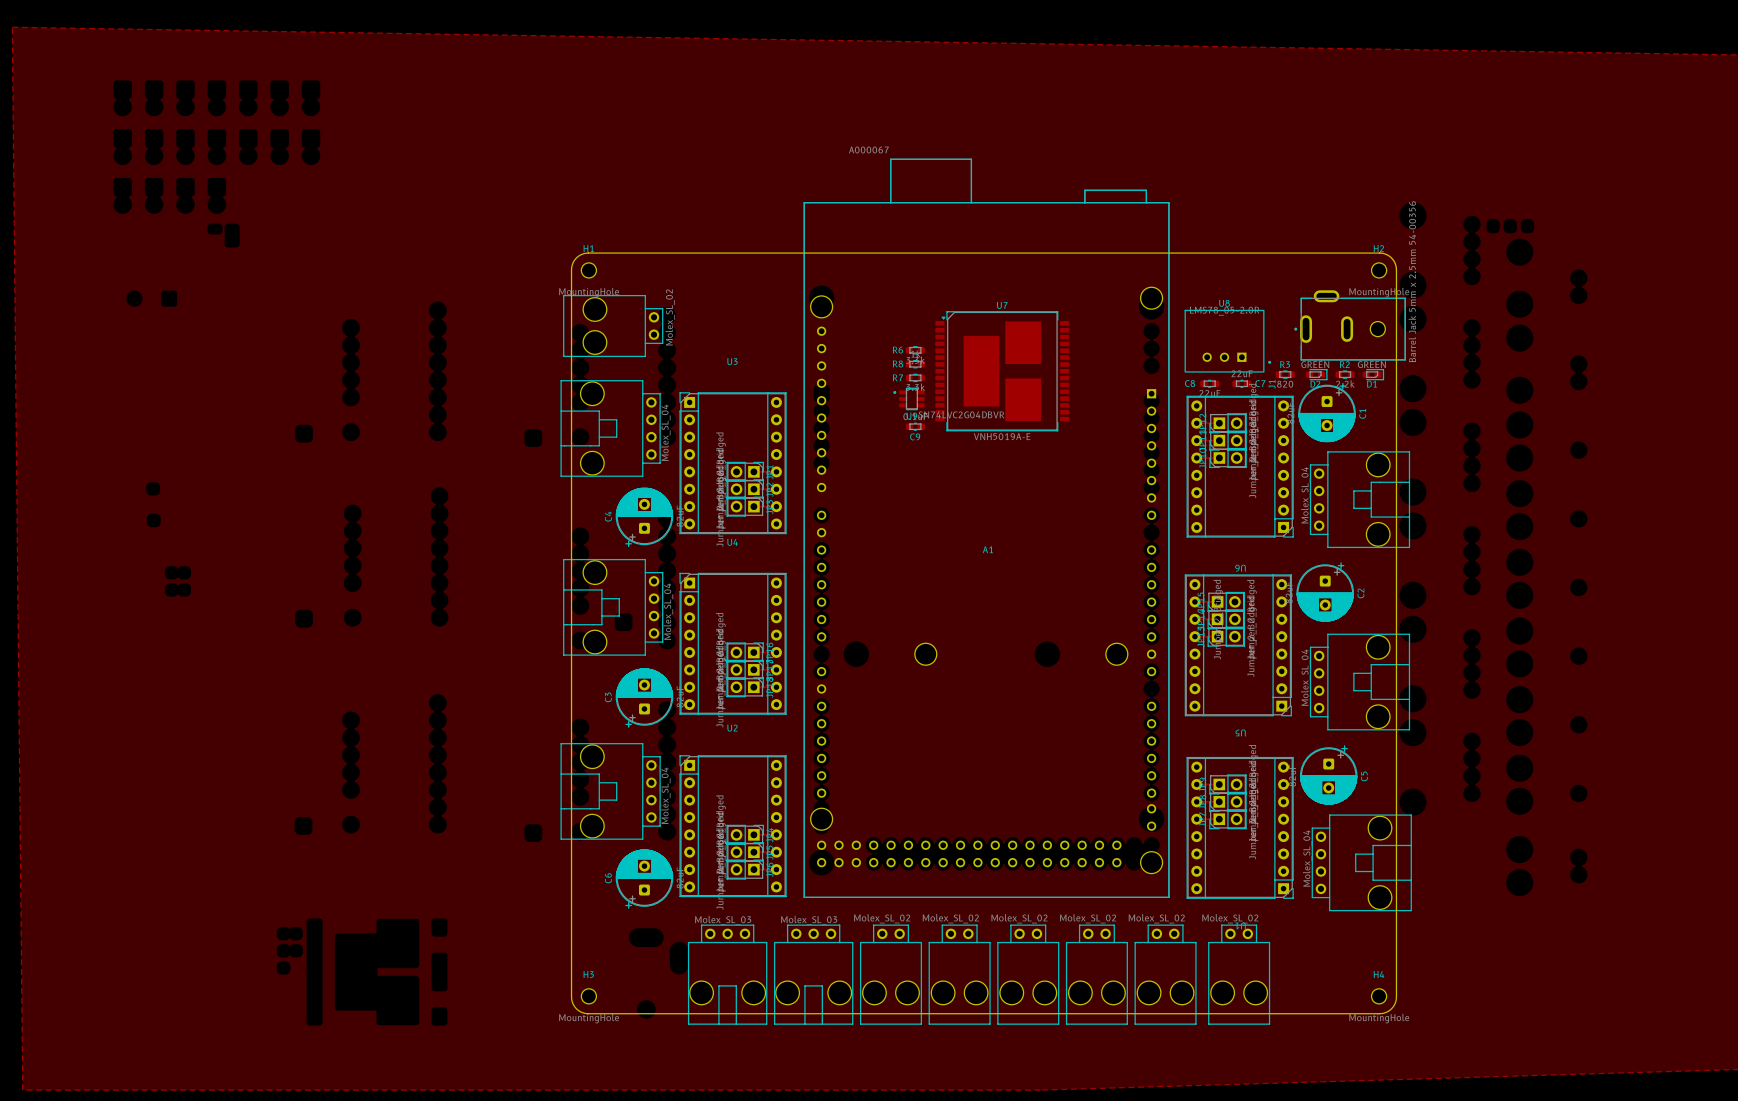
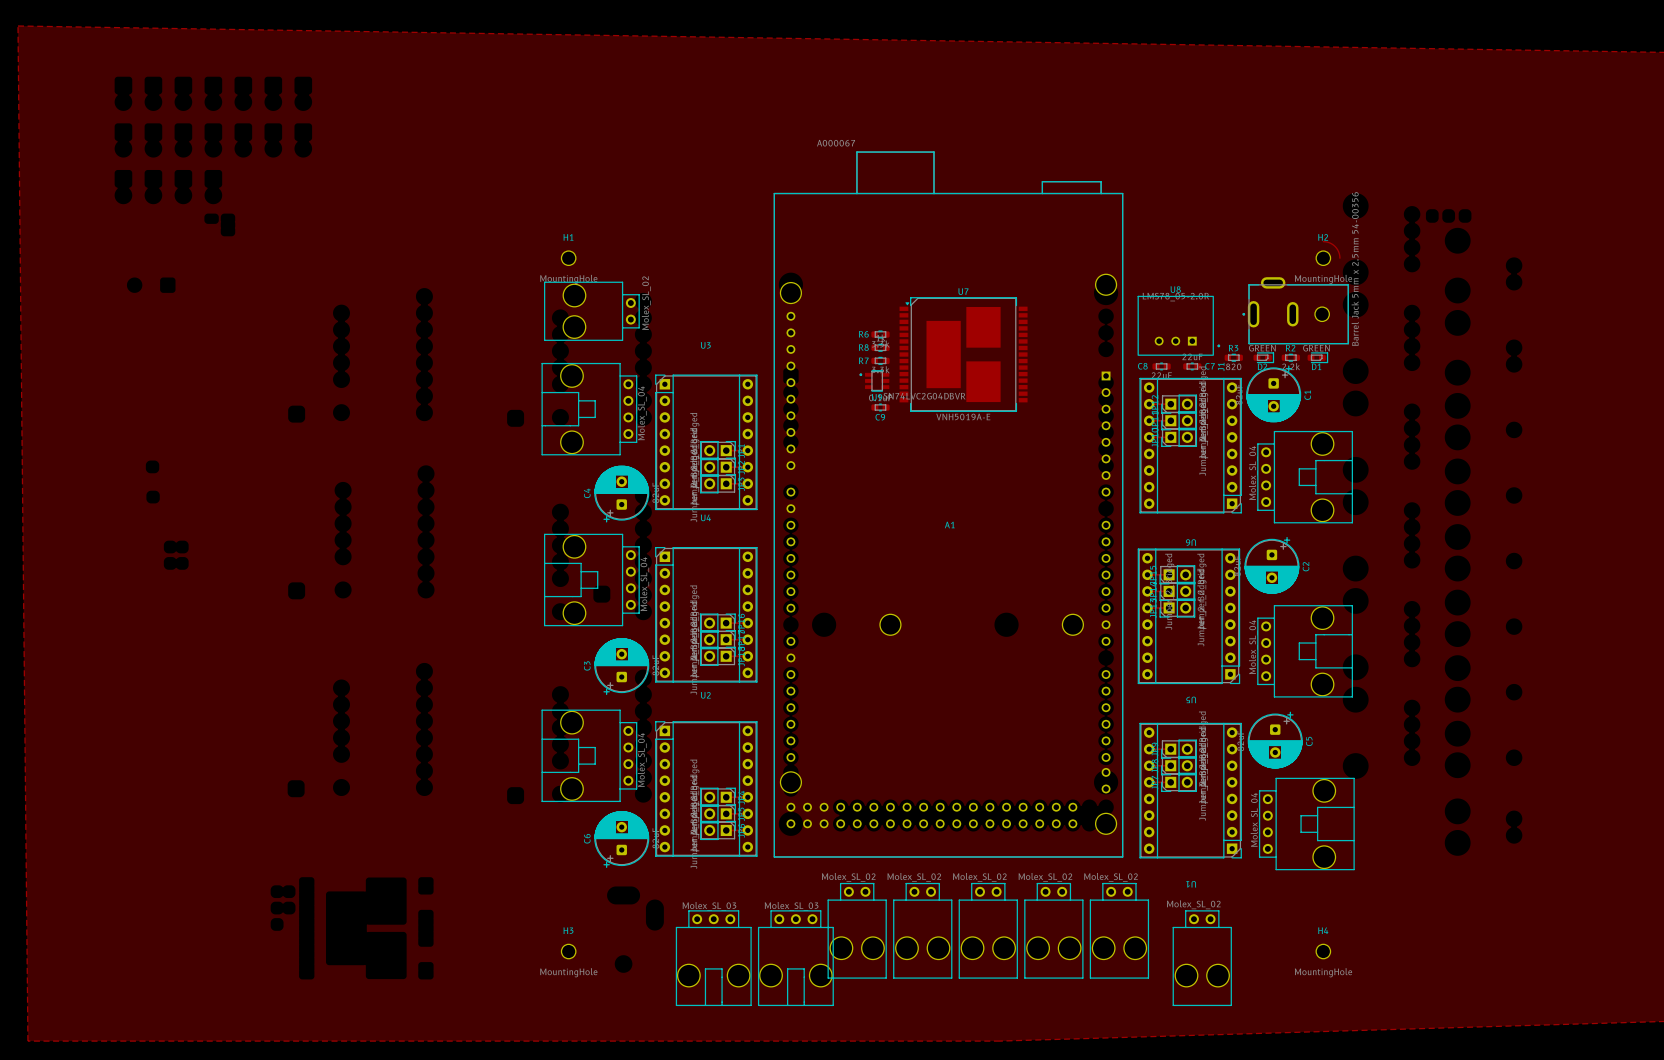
board edge: (588, 253) (1379, 253) (1391, 257) (1396, 269) (1396, 996) (1391, 1008) (1379, 1013) (588, 1013) (576, 1008) (571, 996) (571, 269) (576, 257) (588, 253) -> none
part position: (727, 974) -> (713, 958)
part position: (813, 974) -> (795, 958)
part position: (1239, 974) -> (1202, 958)

